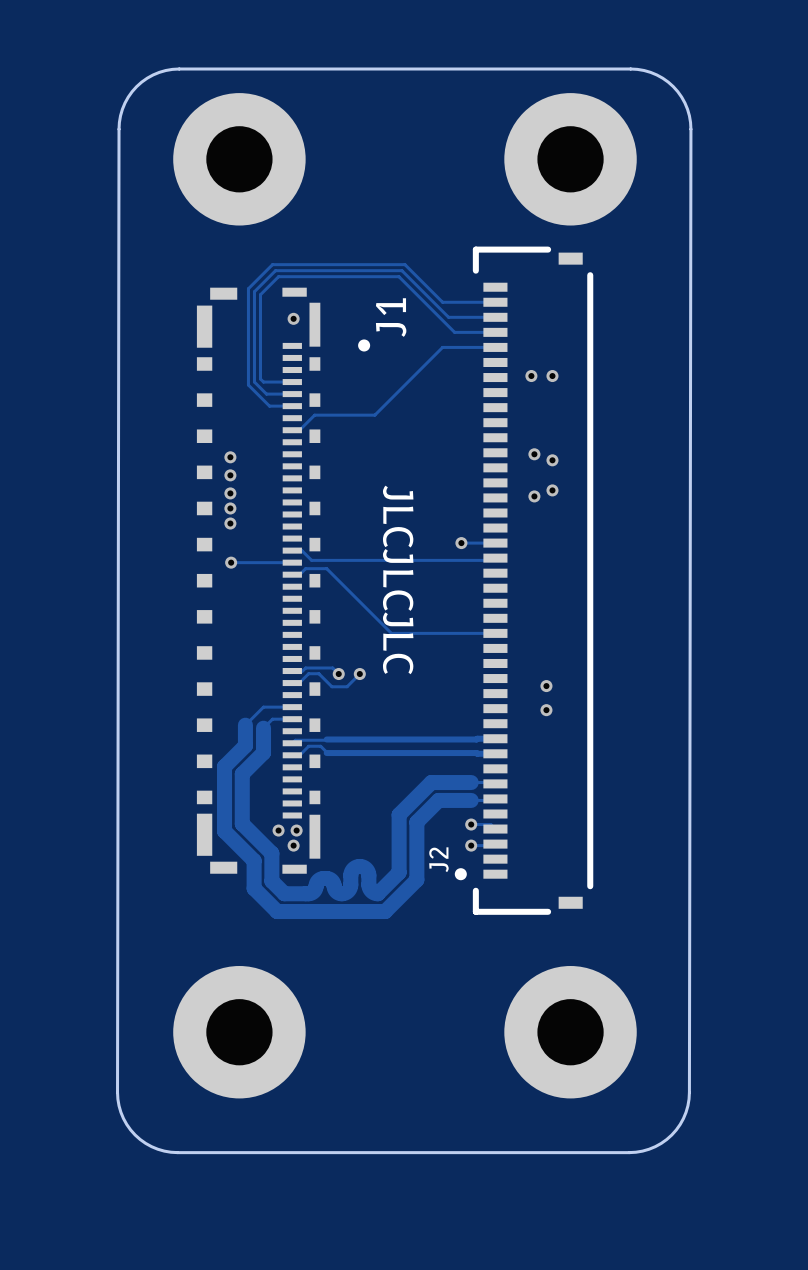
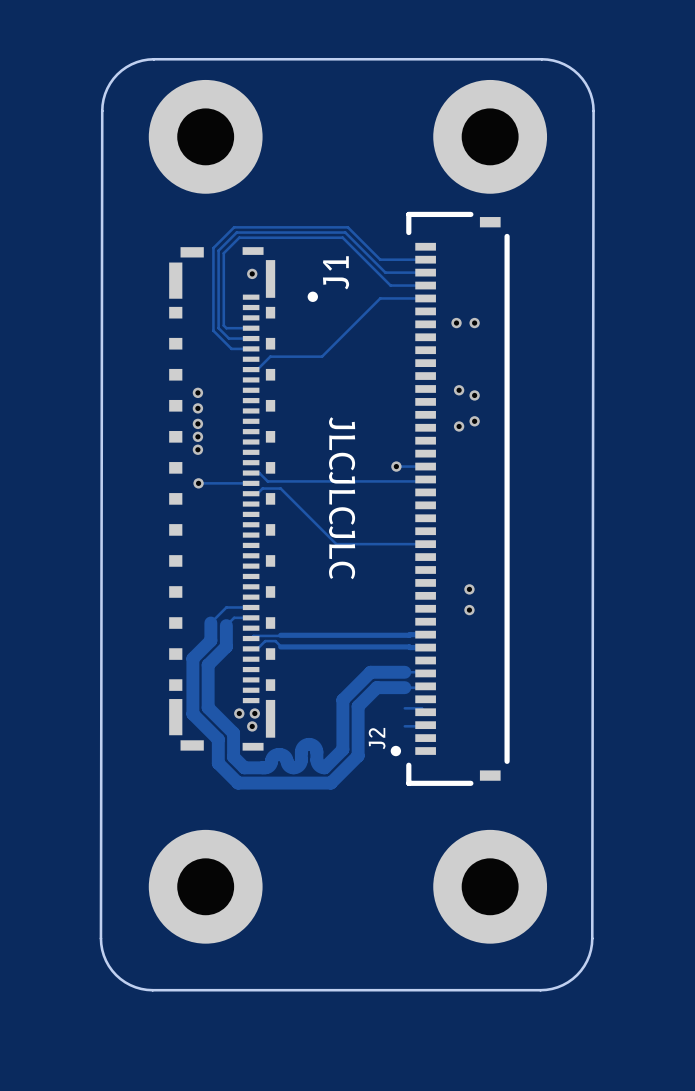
track: (292, 671) (302, 671) (305, 668) (332, 668) (338, 674) -> none
via: (338, 674) -> none
track: (359, 674) (347, 686) (331, 686) (318, 673) (308, 673) (299, 683) (292, 683) -> none
via: (359, 674) -> none
via: (471, 824) -> none
via: (471, 845) -> none

